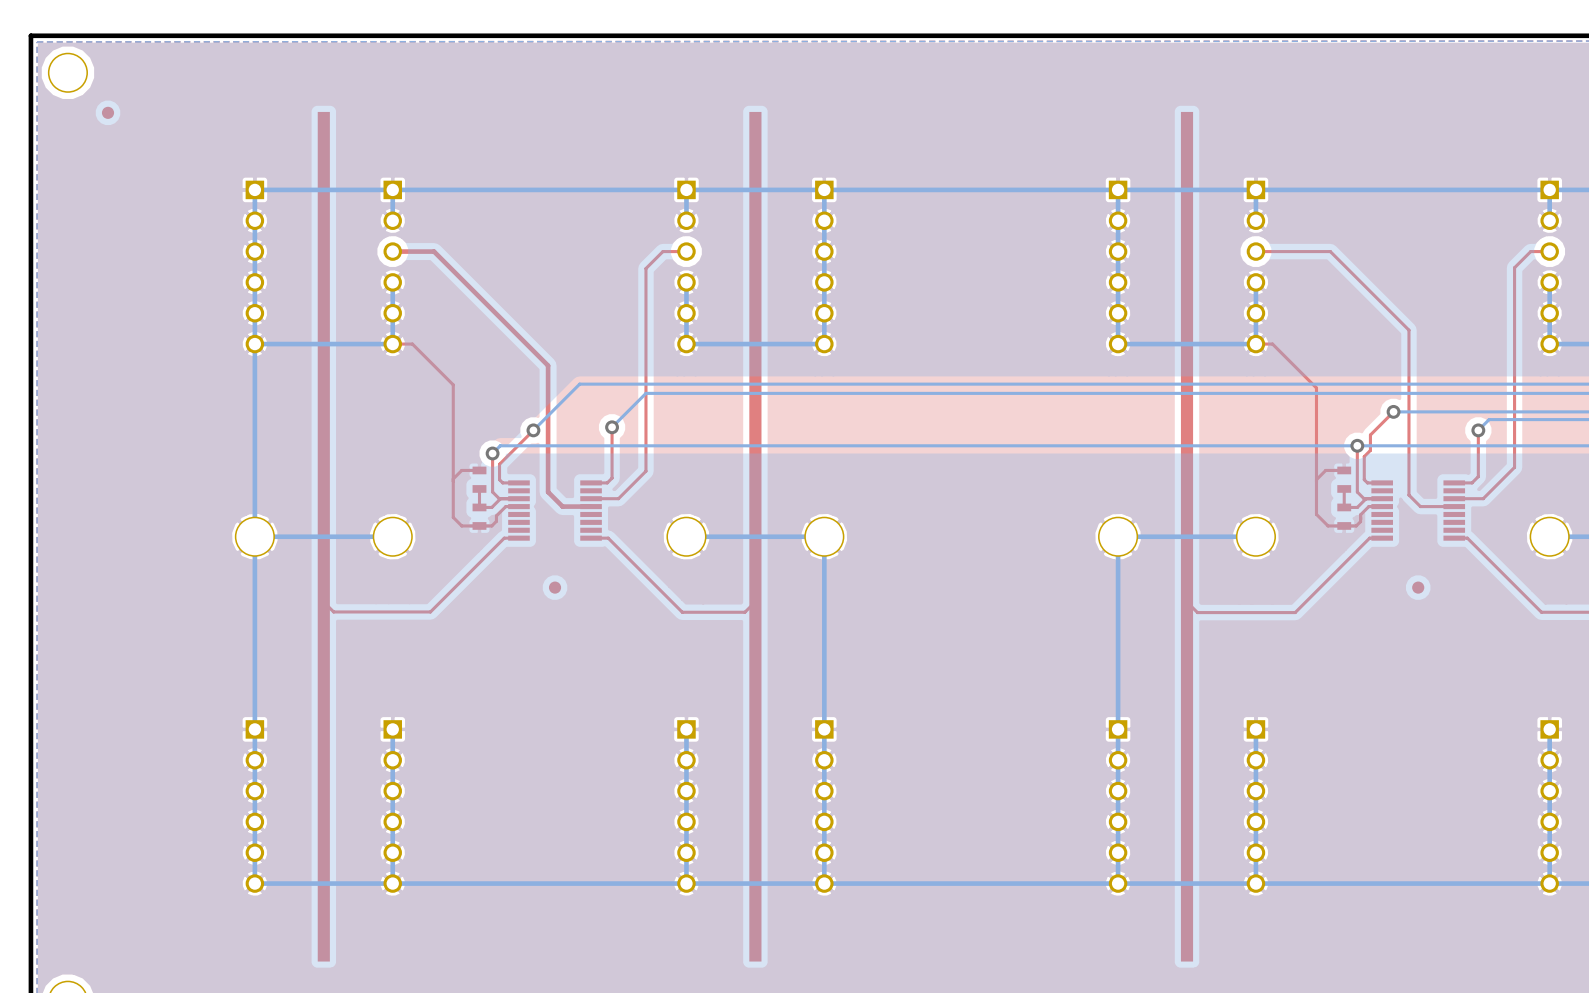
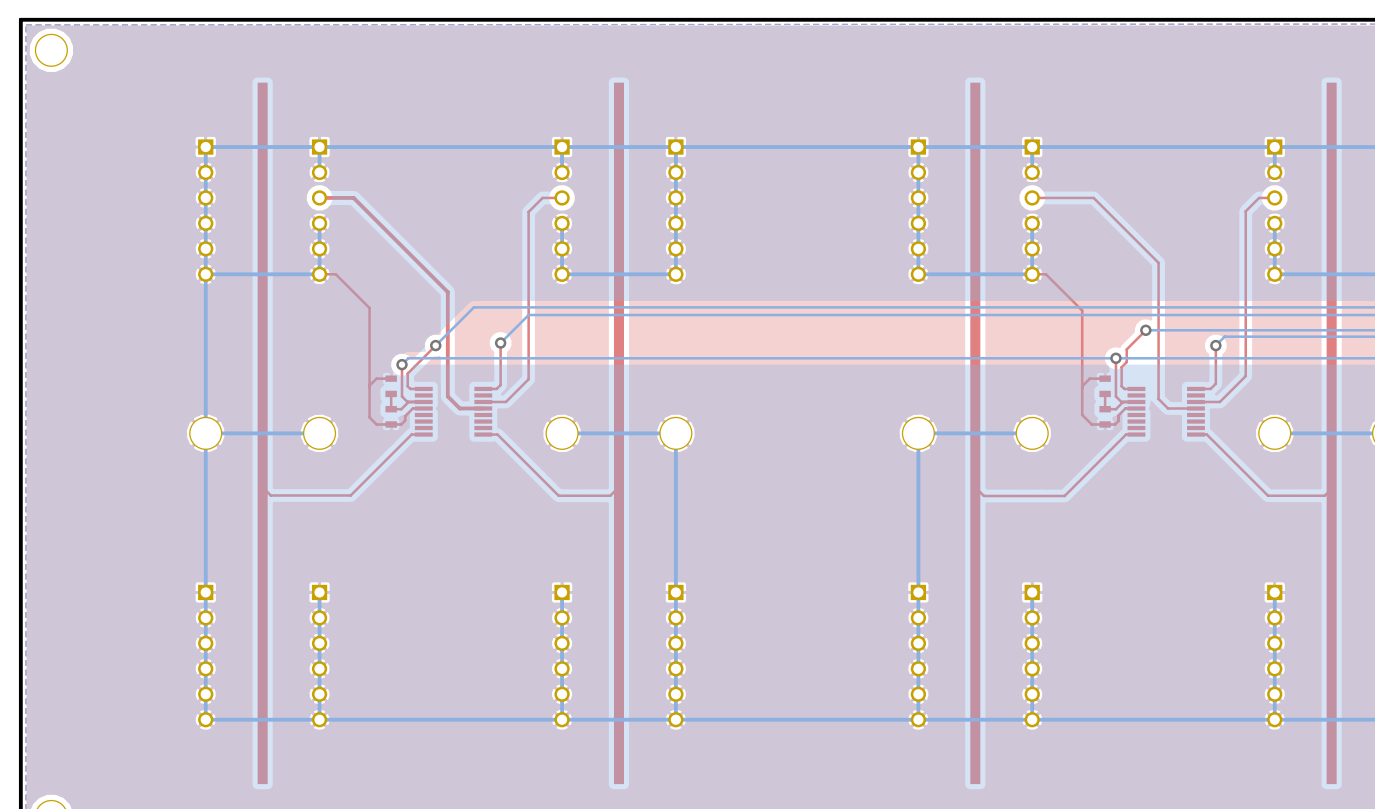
part: (108, 112) -> none
part: (555, 587) -> none
part: (1418, 587) -> none

